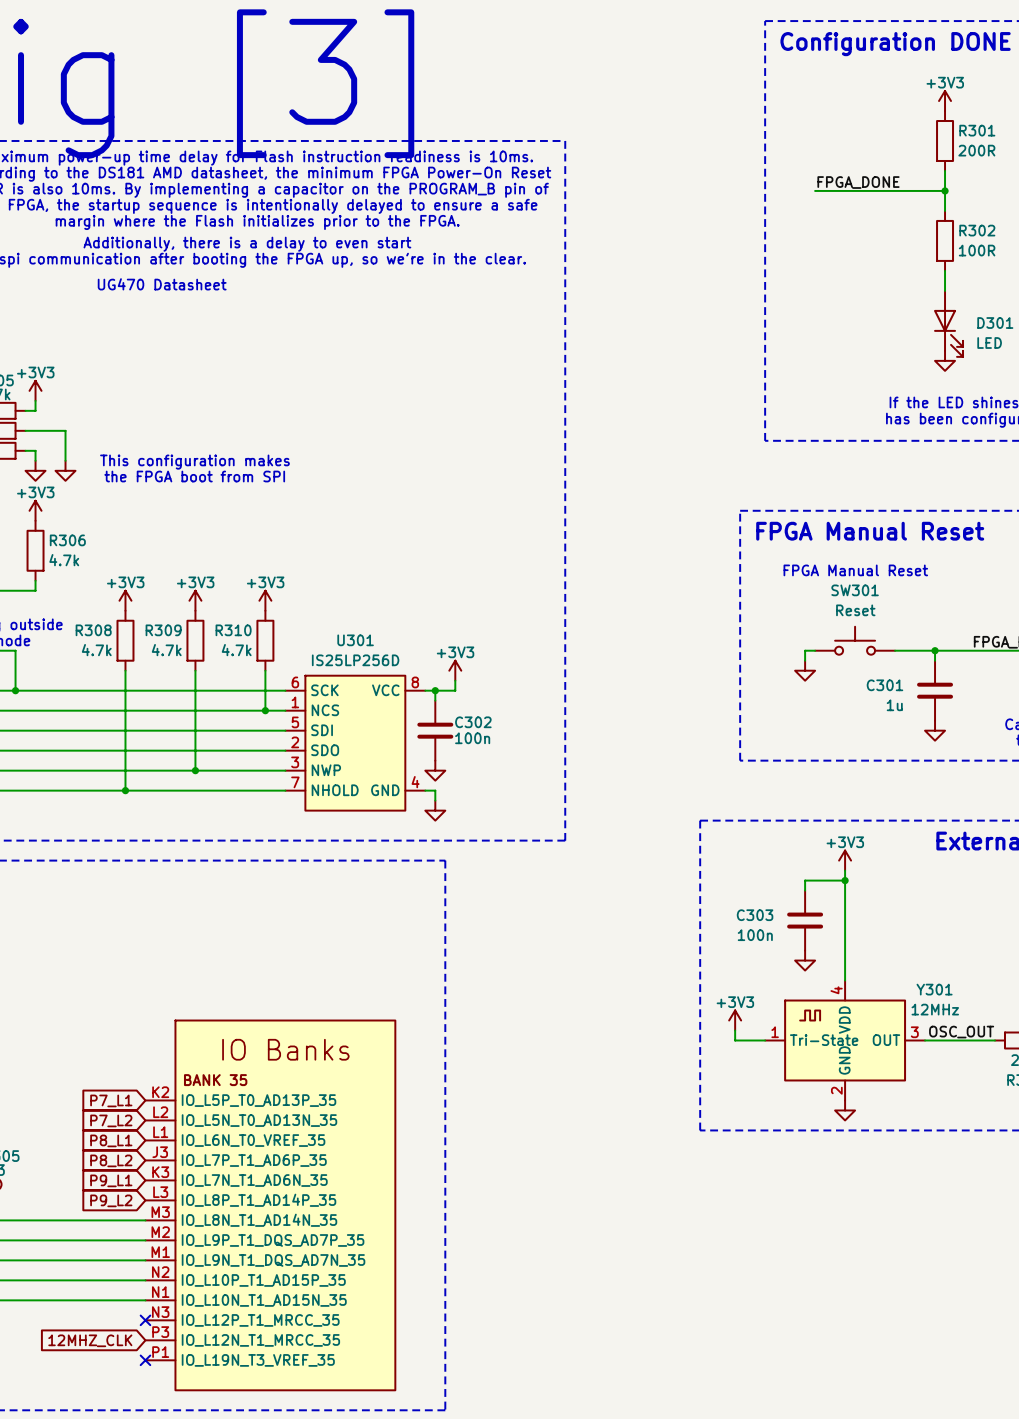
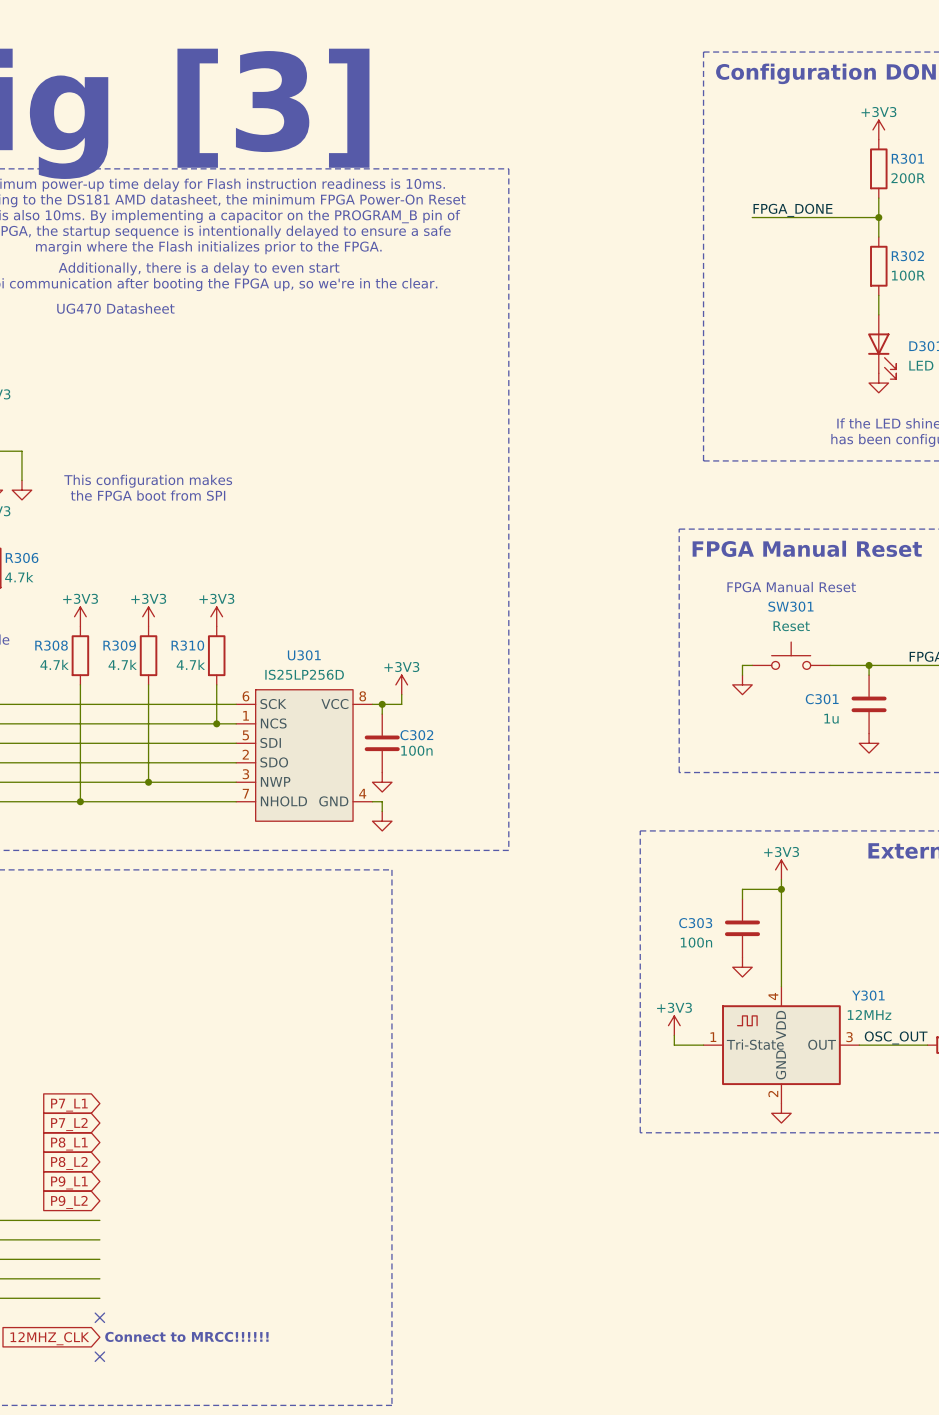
part: (270, 1205) -> none
text: none -> Connect to MRCC!!!!!! (186, 1336)

